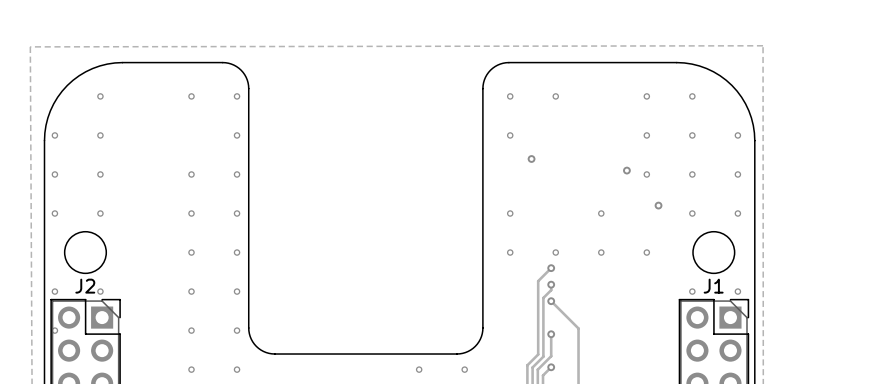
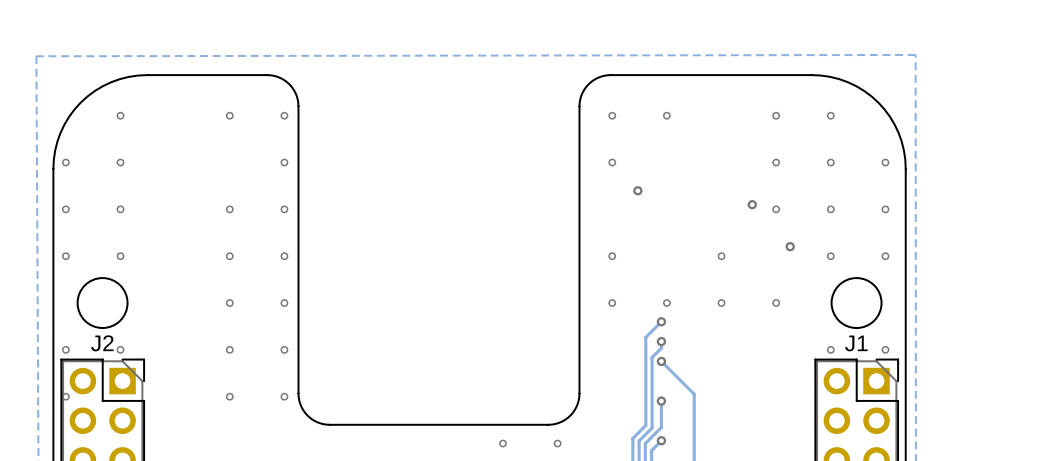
via: (191, 369) -> none
via: (237, 369) -> none

